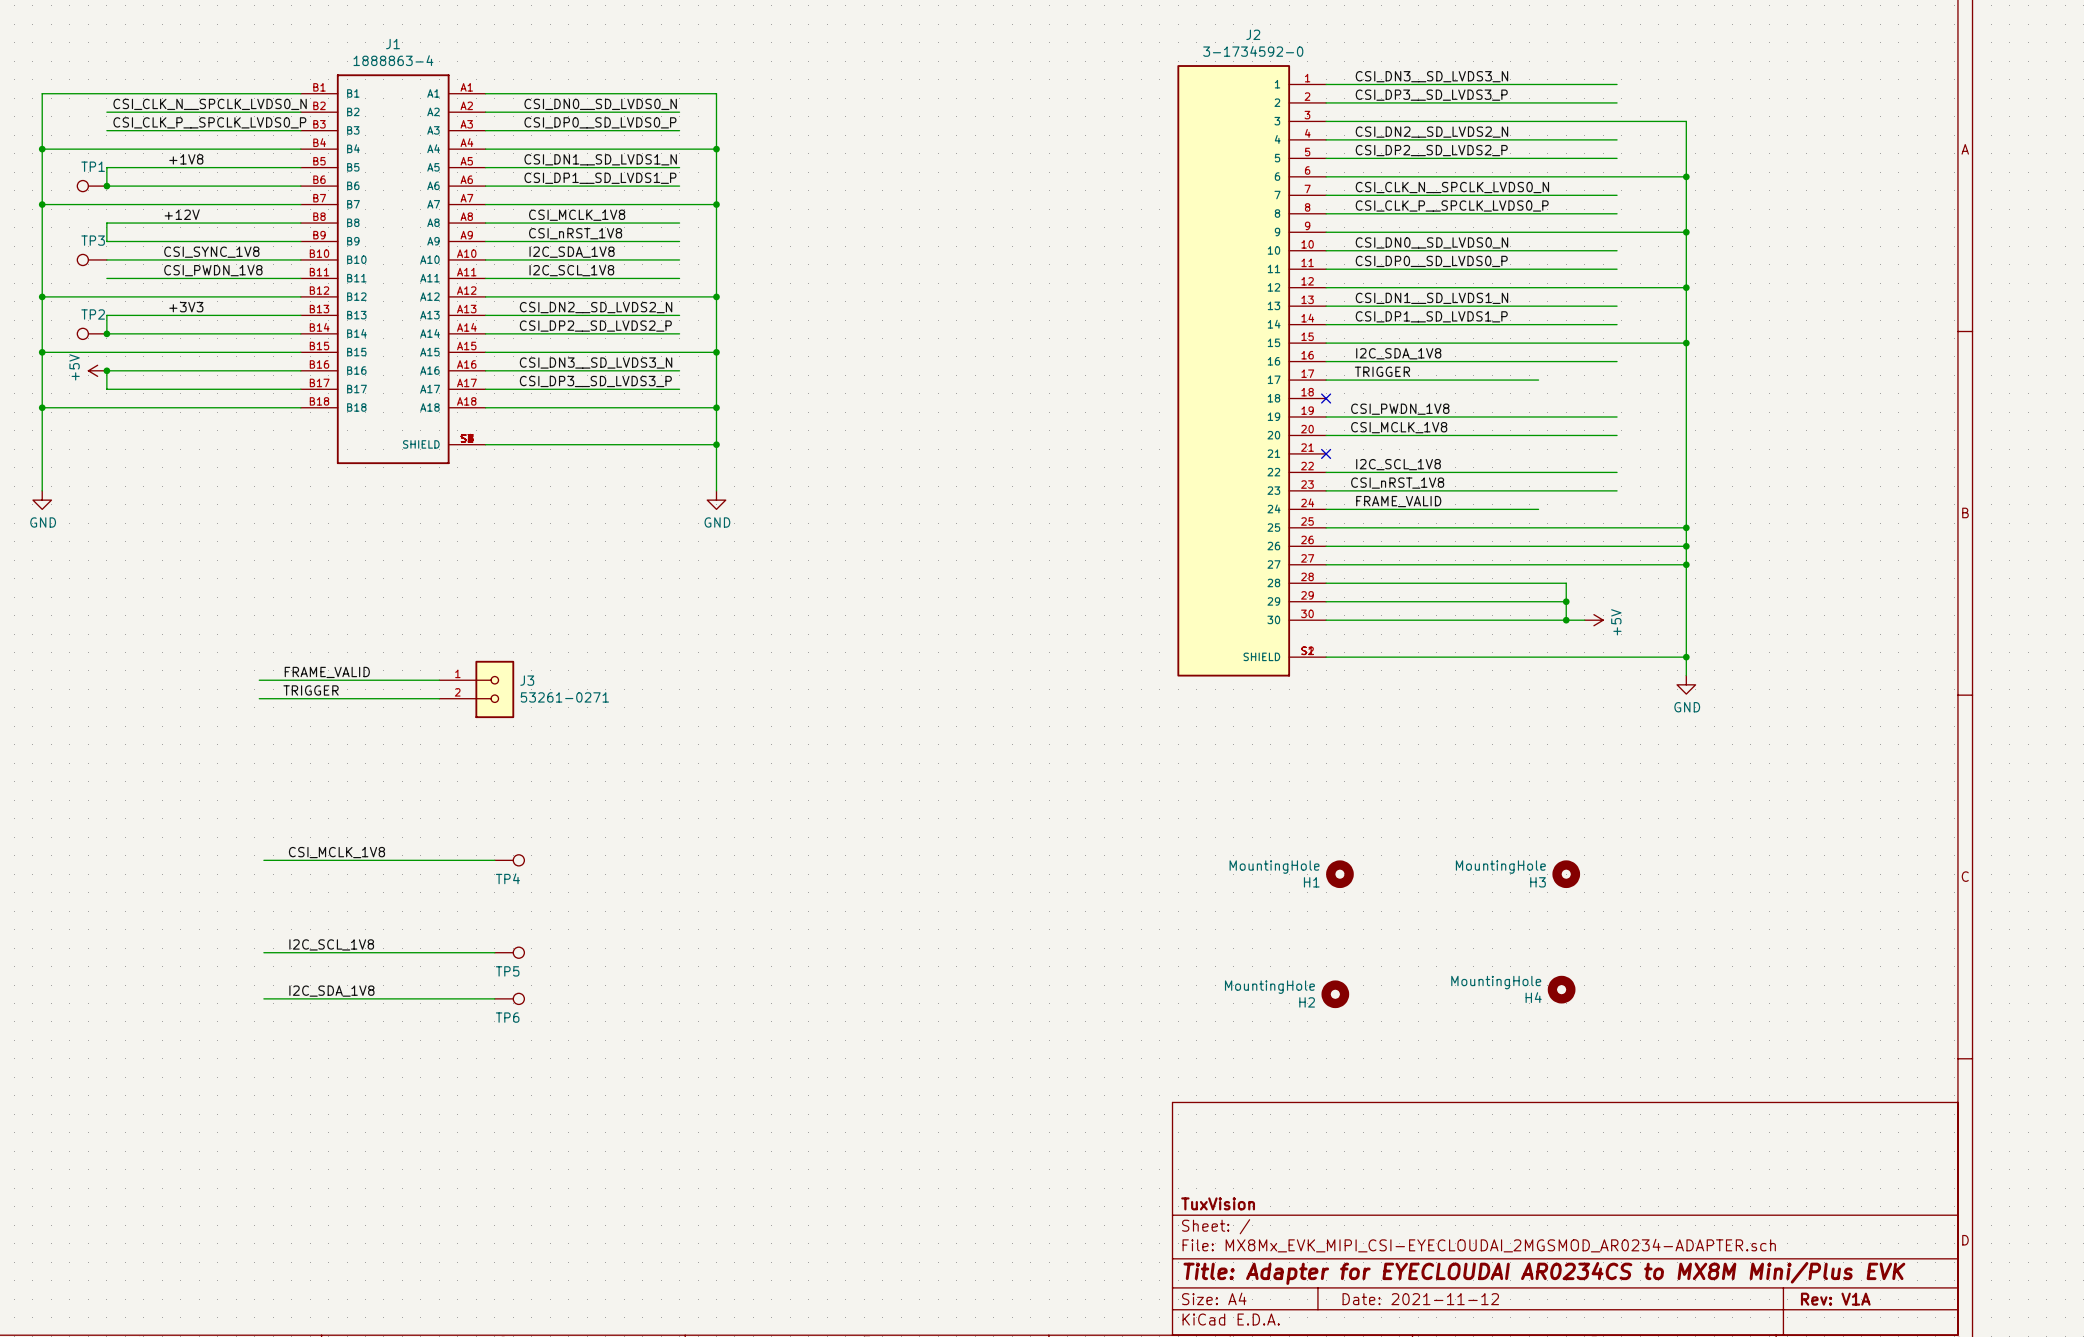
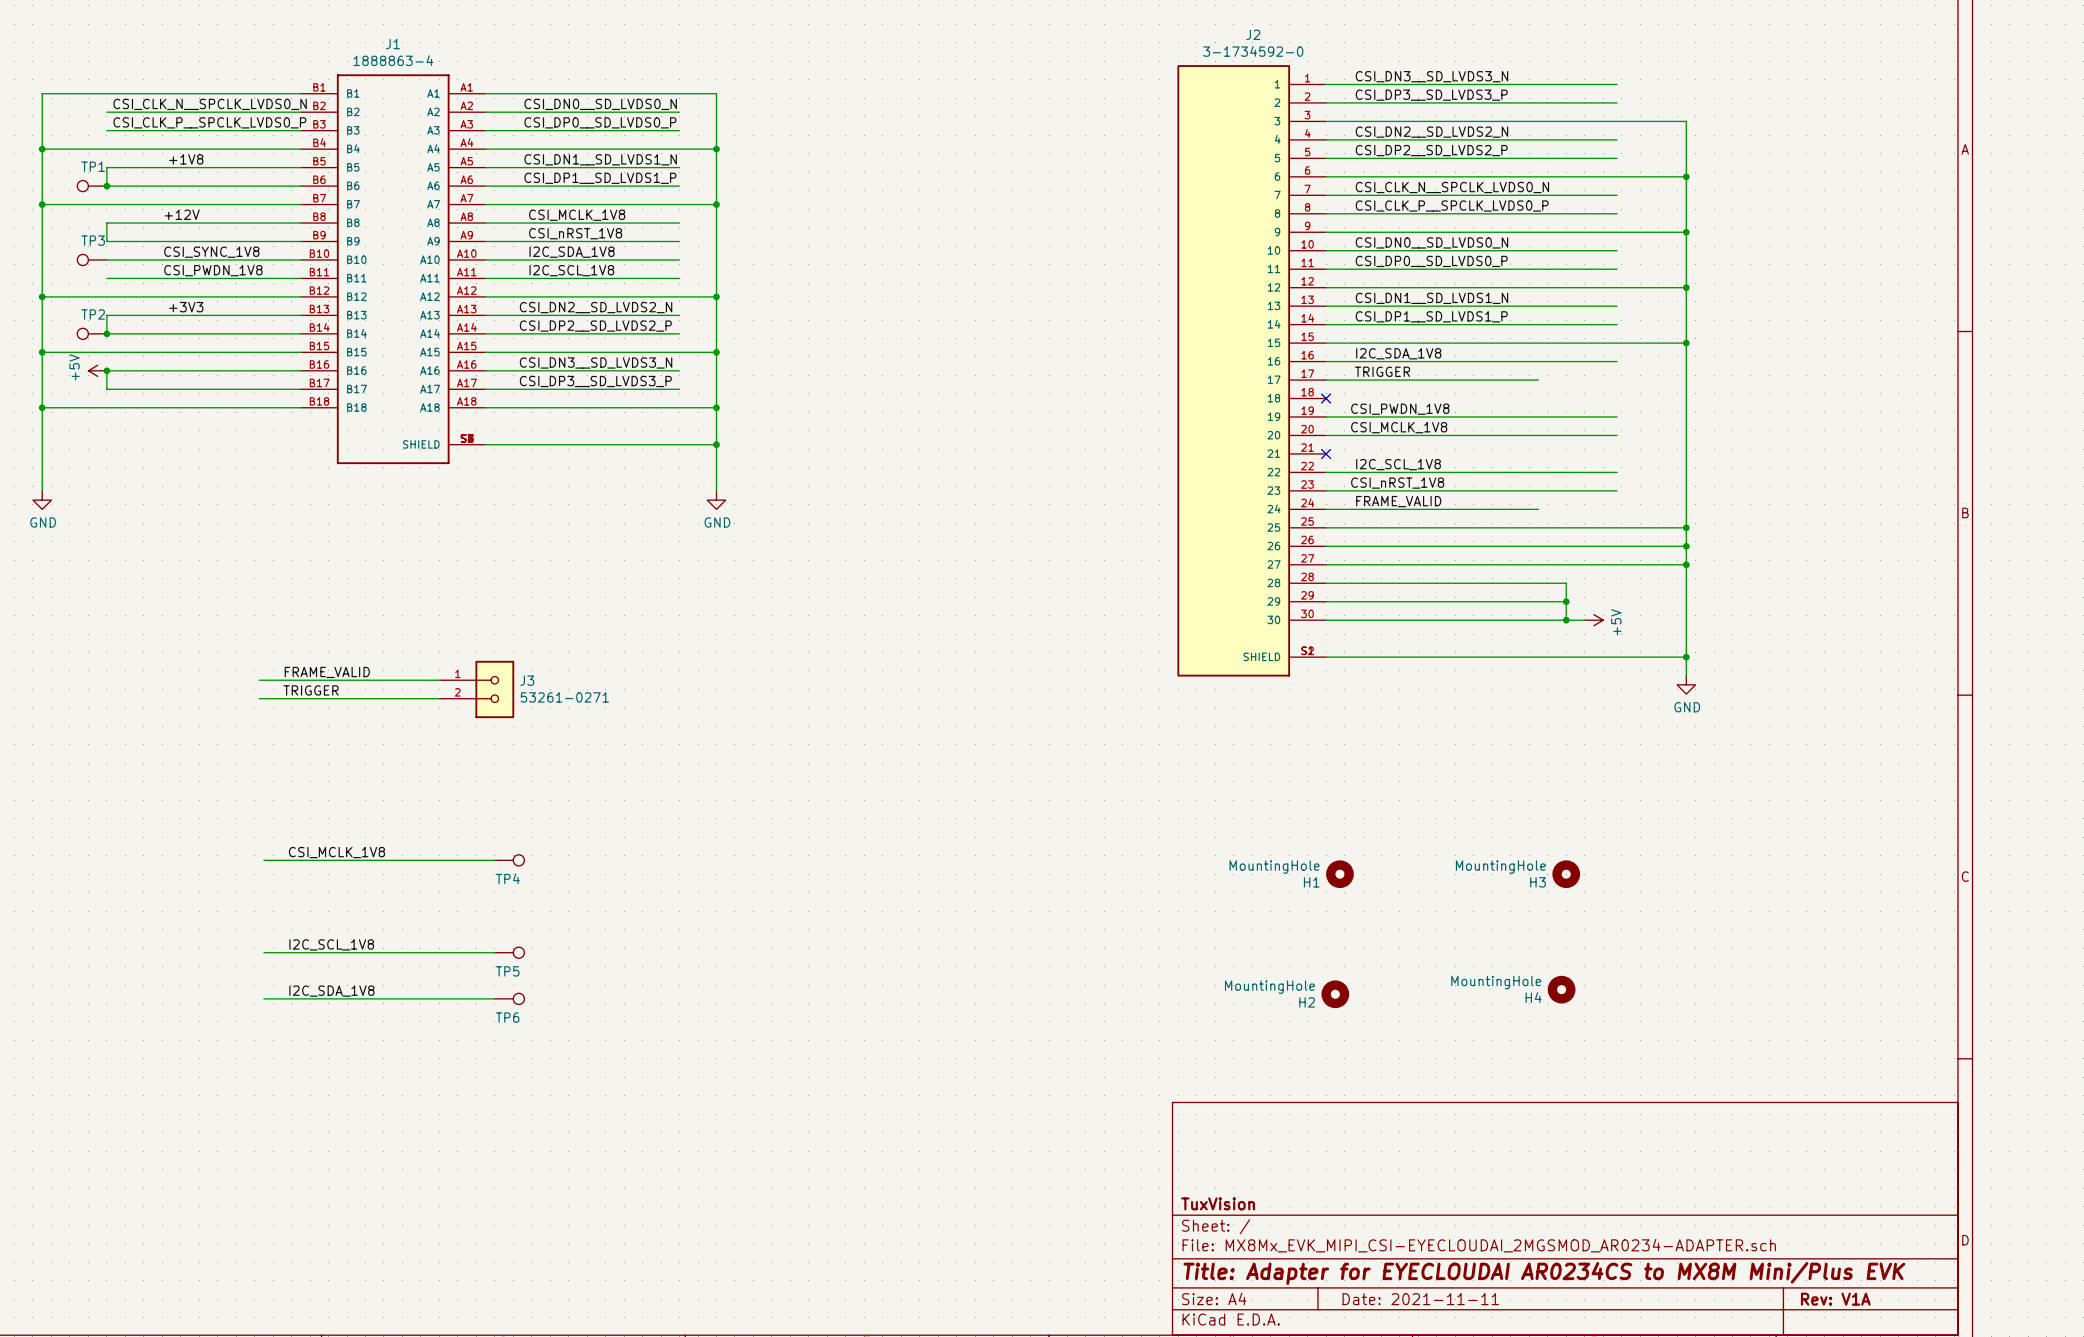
title block: Date: 2021-11-12 (1420, 1299) -> Date: 2021-11-11 (1420, 1299)

